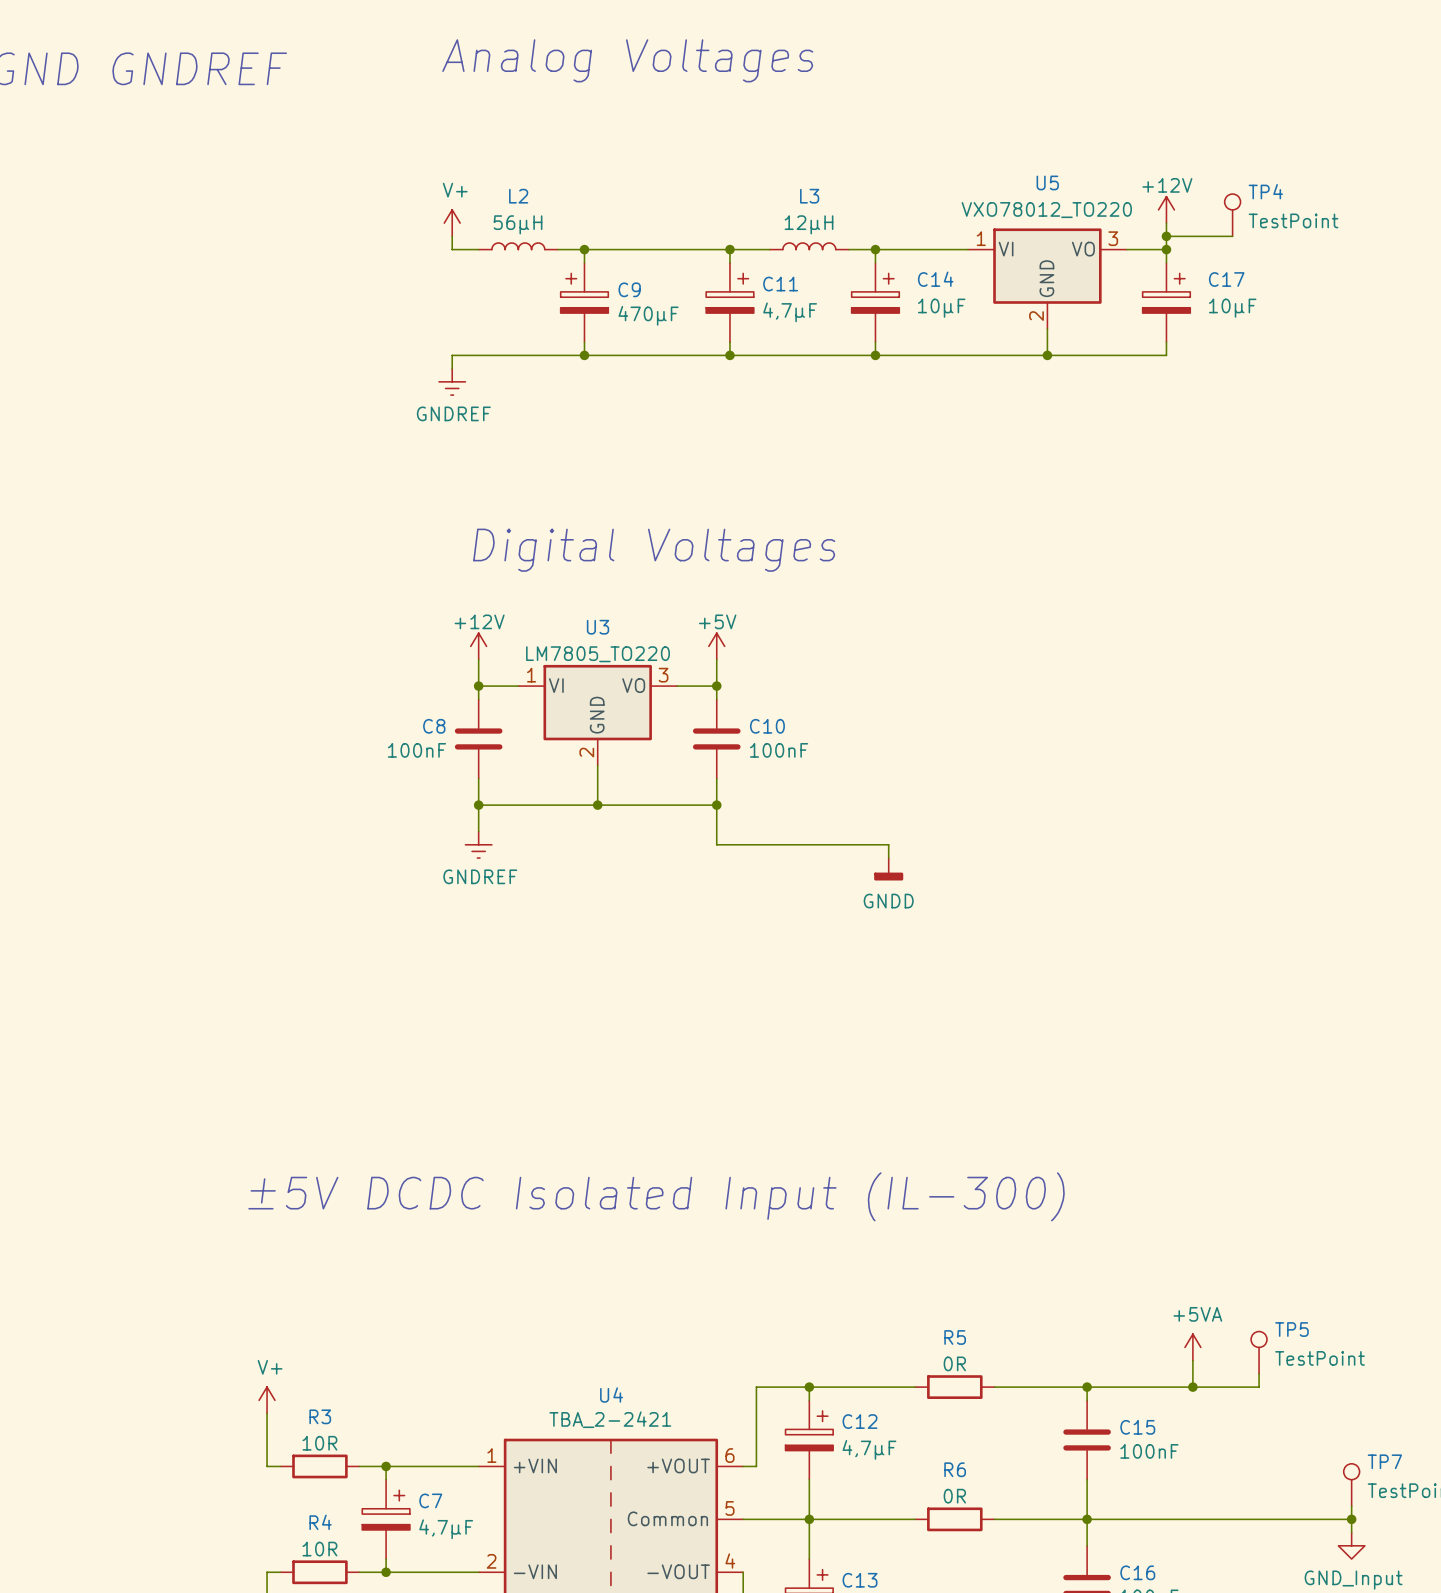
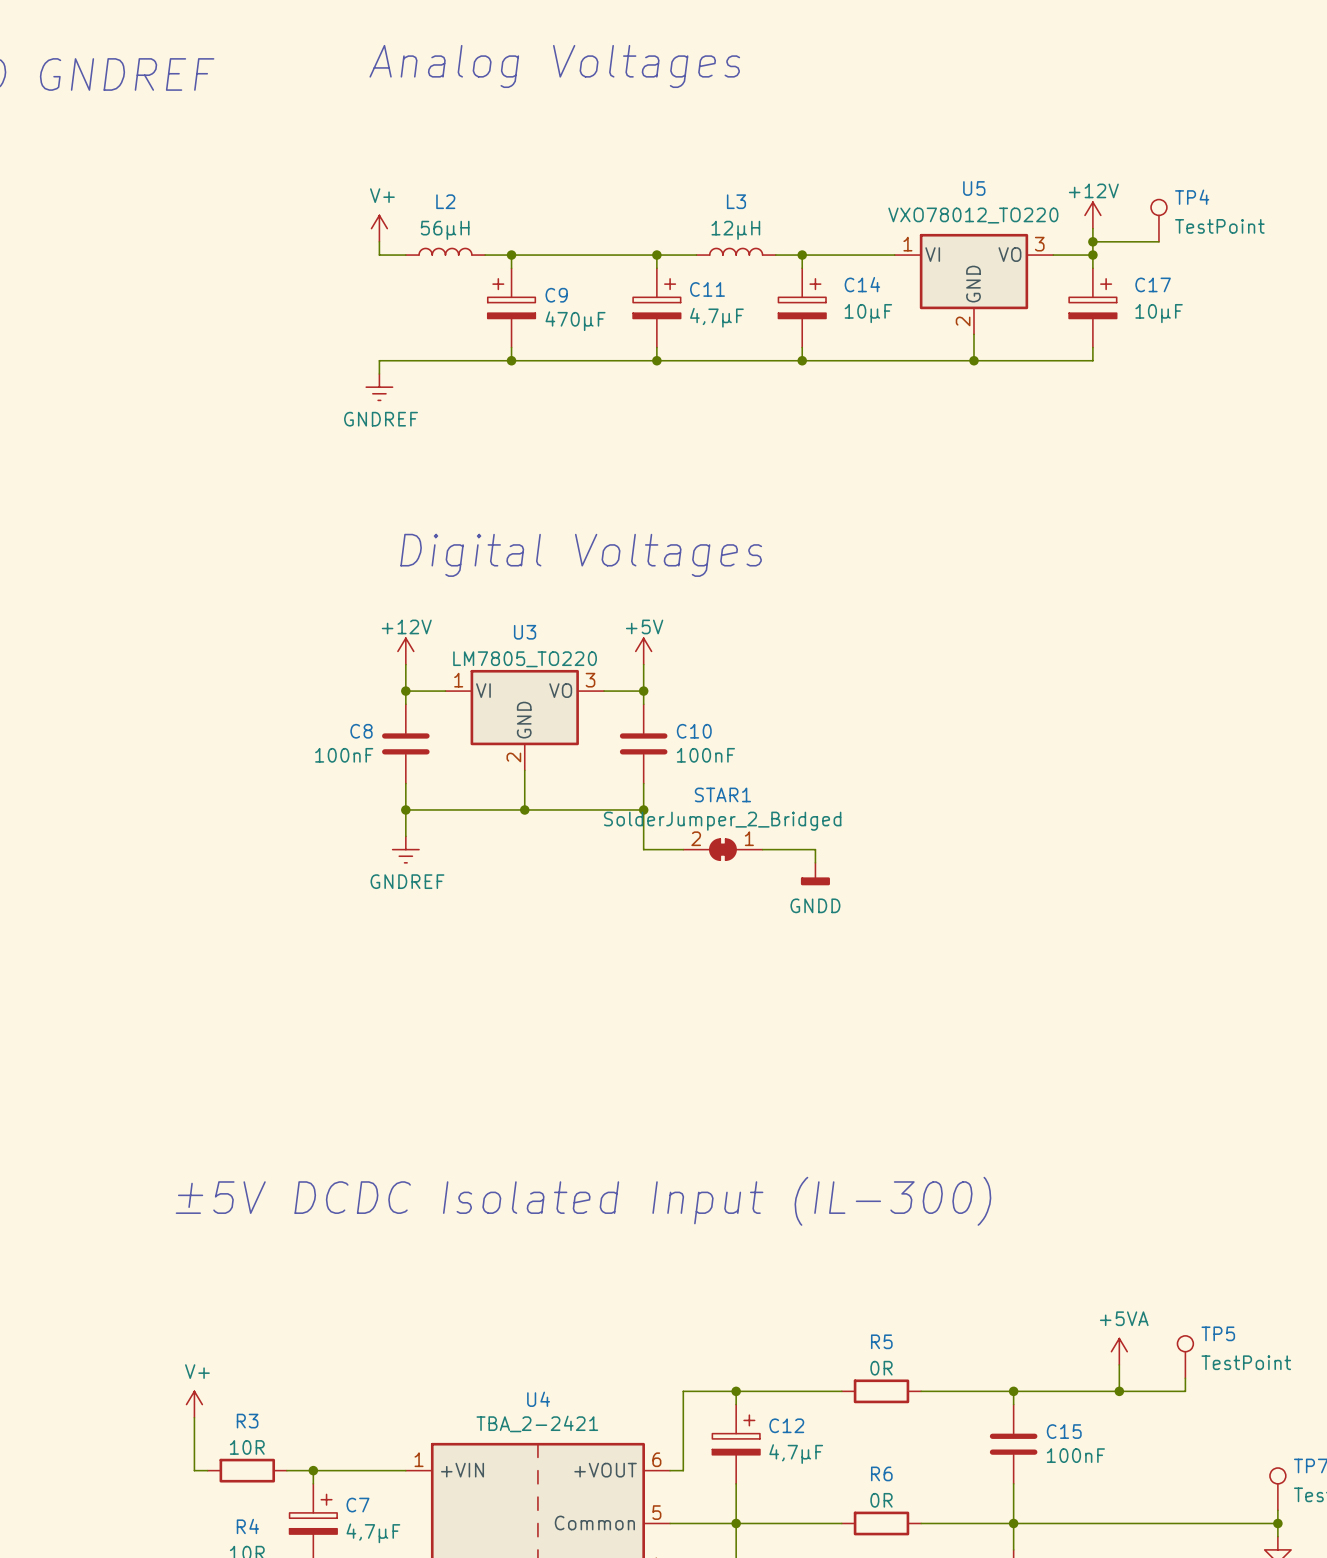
STAR1: none -> SolderJumper_2_Bridged (722, 849)

